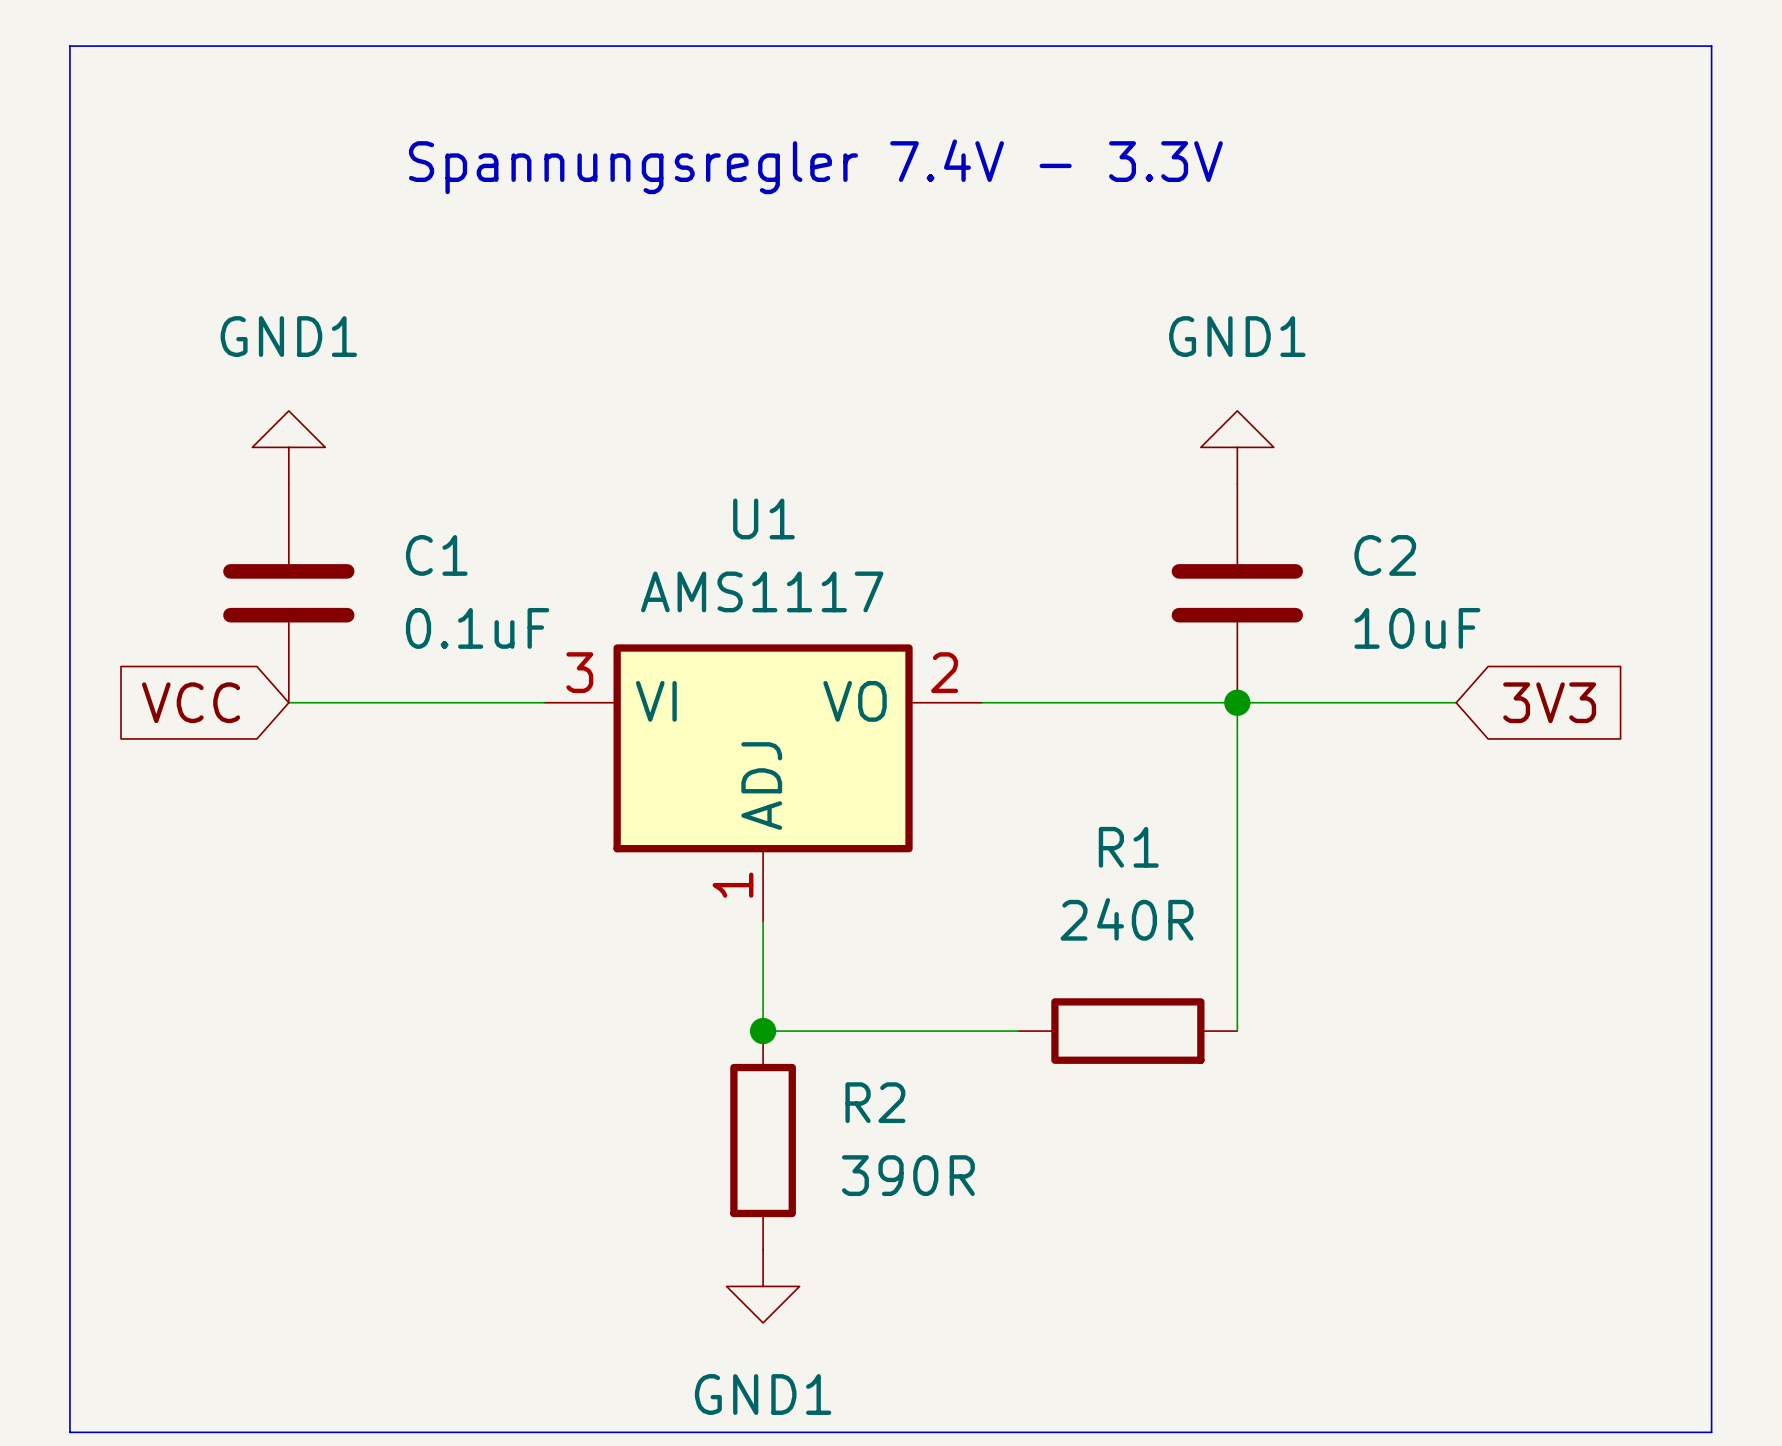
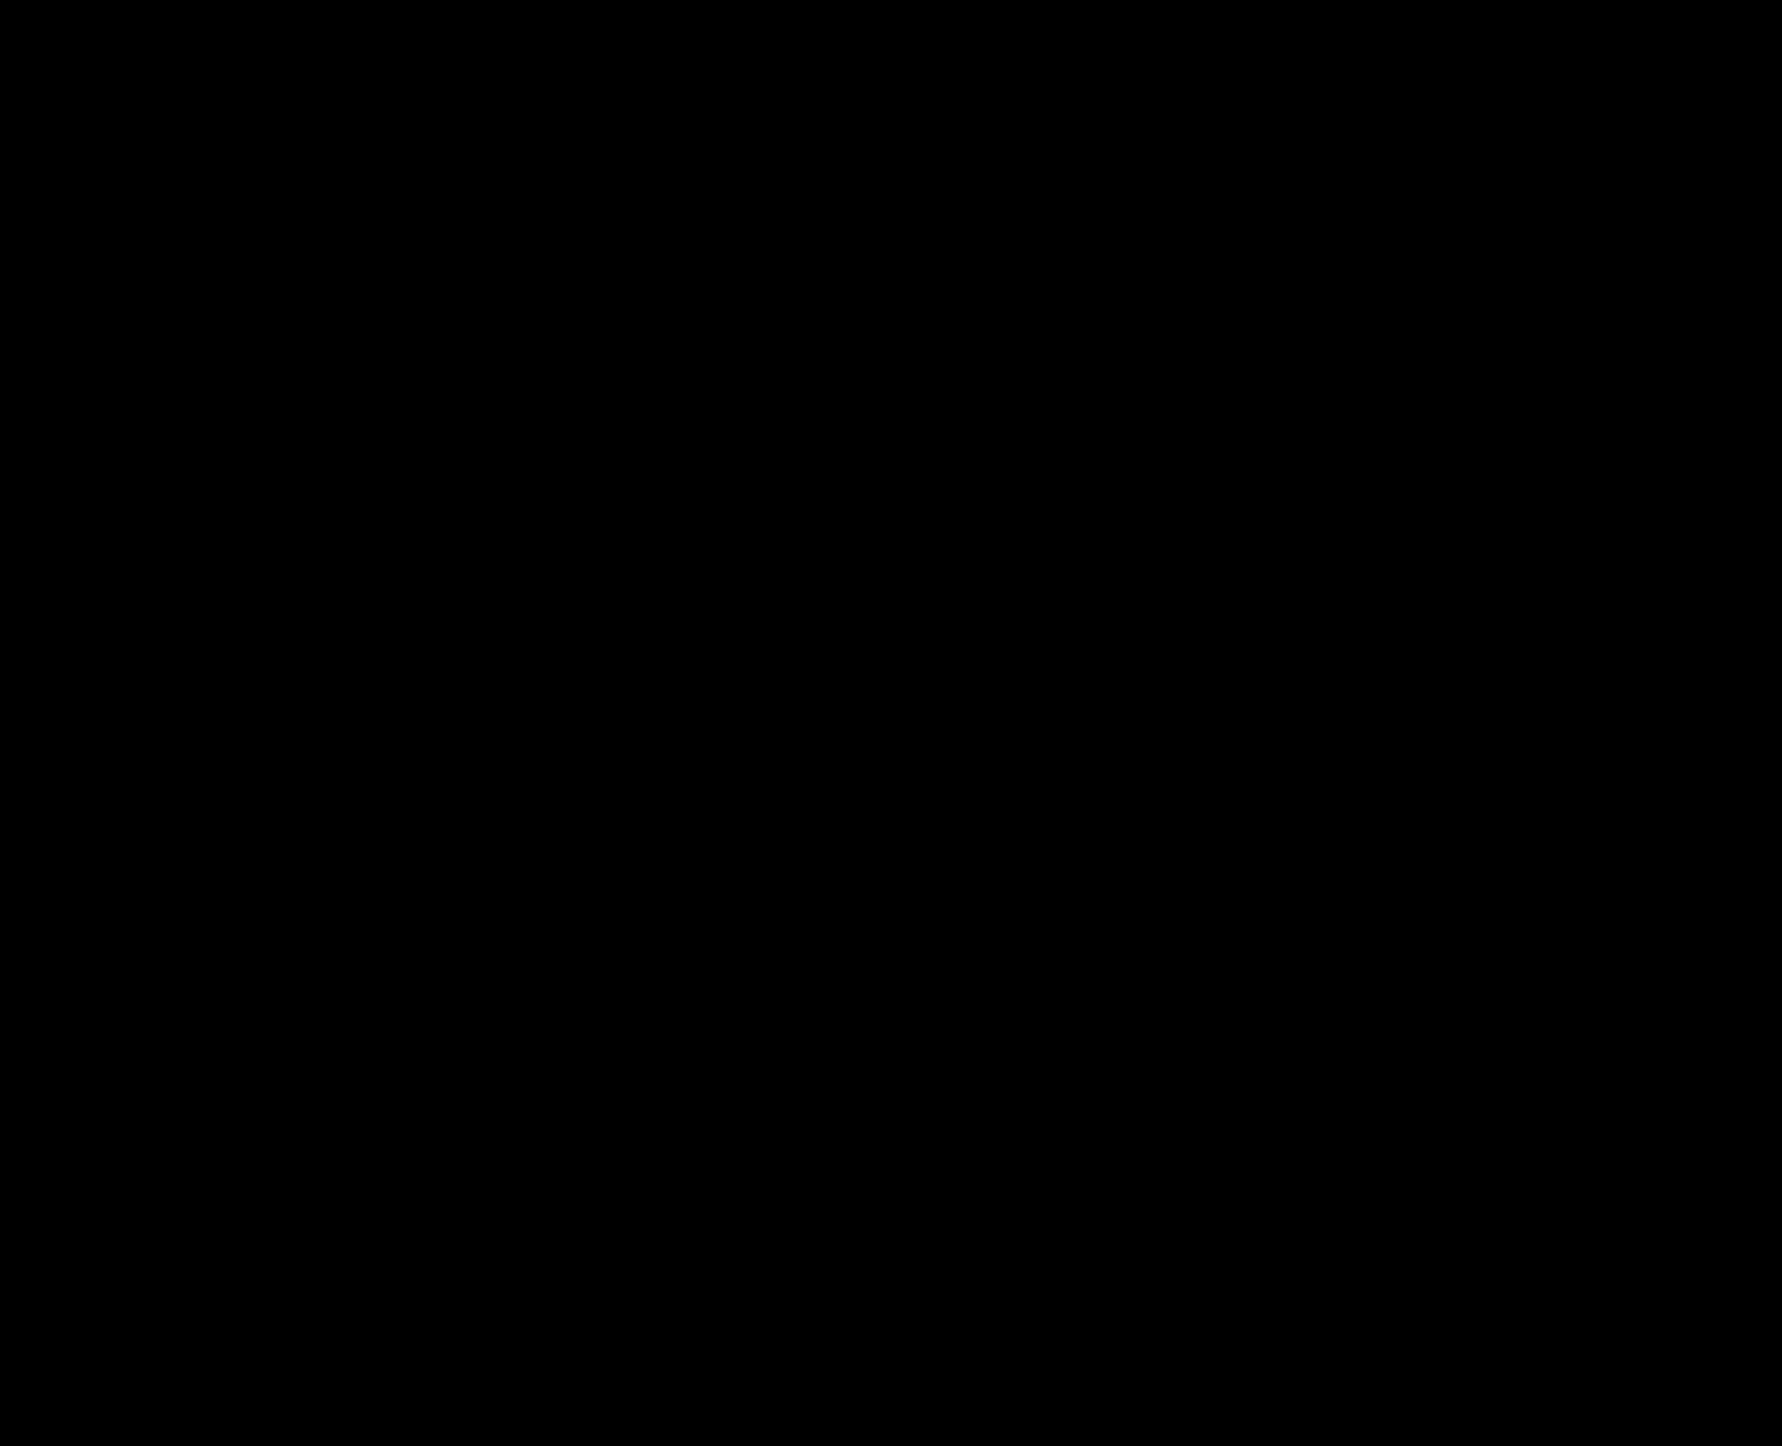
line: (69, 46) (1711, 46) (1711, 1432) (69, 1432) (69, 46) -> none
text: Spannungsregler 7.4V - 3.3V (815, 166) -> none
power symbol: GND1 (288, 447) -> none
power symbol: GND1 (1237, 447) -> none
C1: 0.1uF (288, 593) -> none
C2: 10uF (1237, 593) -> none
global label: VCC (191, 702) -> none
wire: (288, 702) (544, 702) -> none
wire: (981, 702) (1456, 702) -> none
wire: (1237, 702) (1237, 1031) -> none
junction: (1237, 702) -> none
global label: 3V3 (1549, 702) -> none
U1: AMS1117 (763, 782) -> none
wire: (763, 921) (763, 1031) (1018, 1031) -> none
junction: (763, 1031) -> none
R1: 240R (1127, 1031) -> none
R2: 390R (763, 1140) -> none
power symbol: GND1 (763, 1286) -> none

